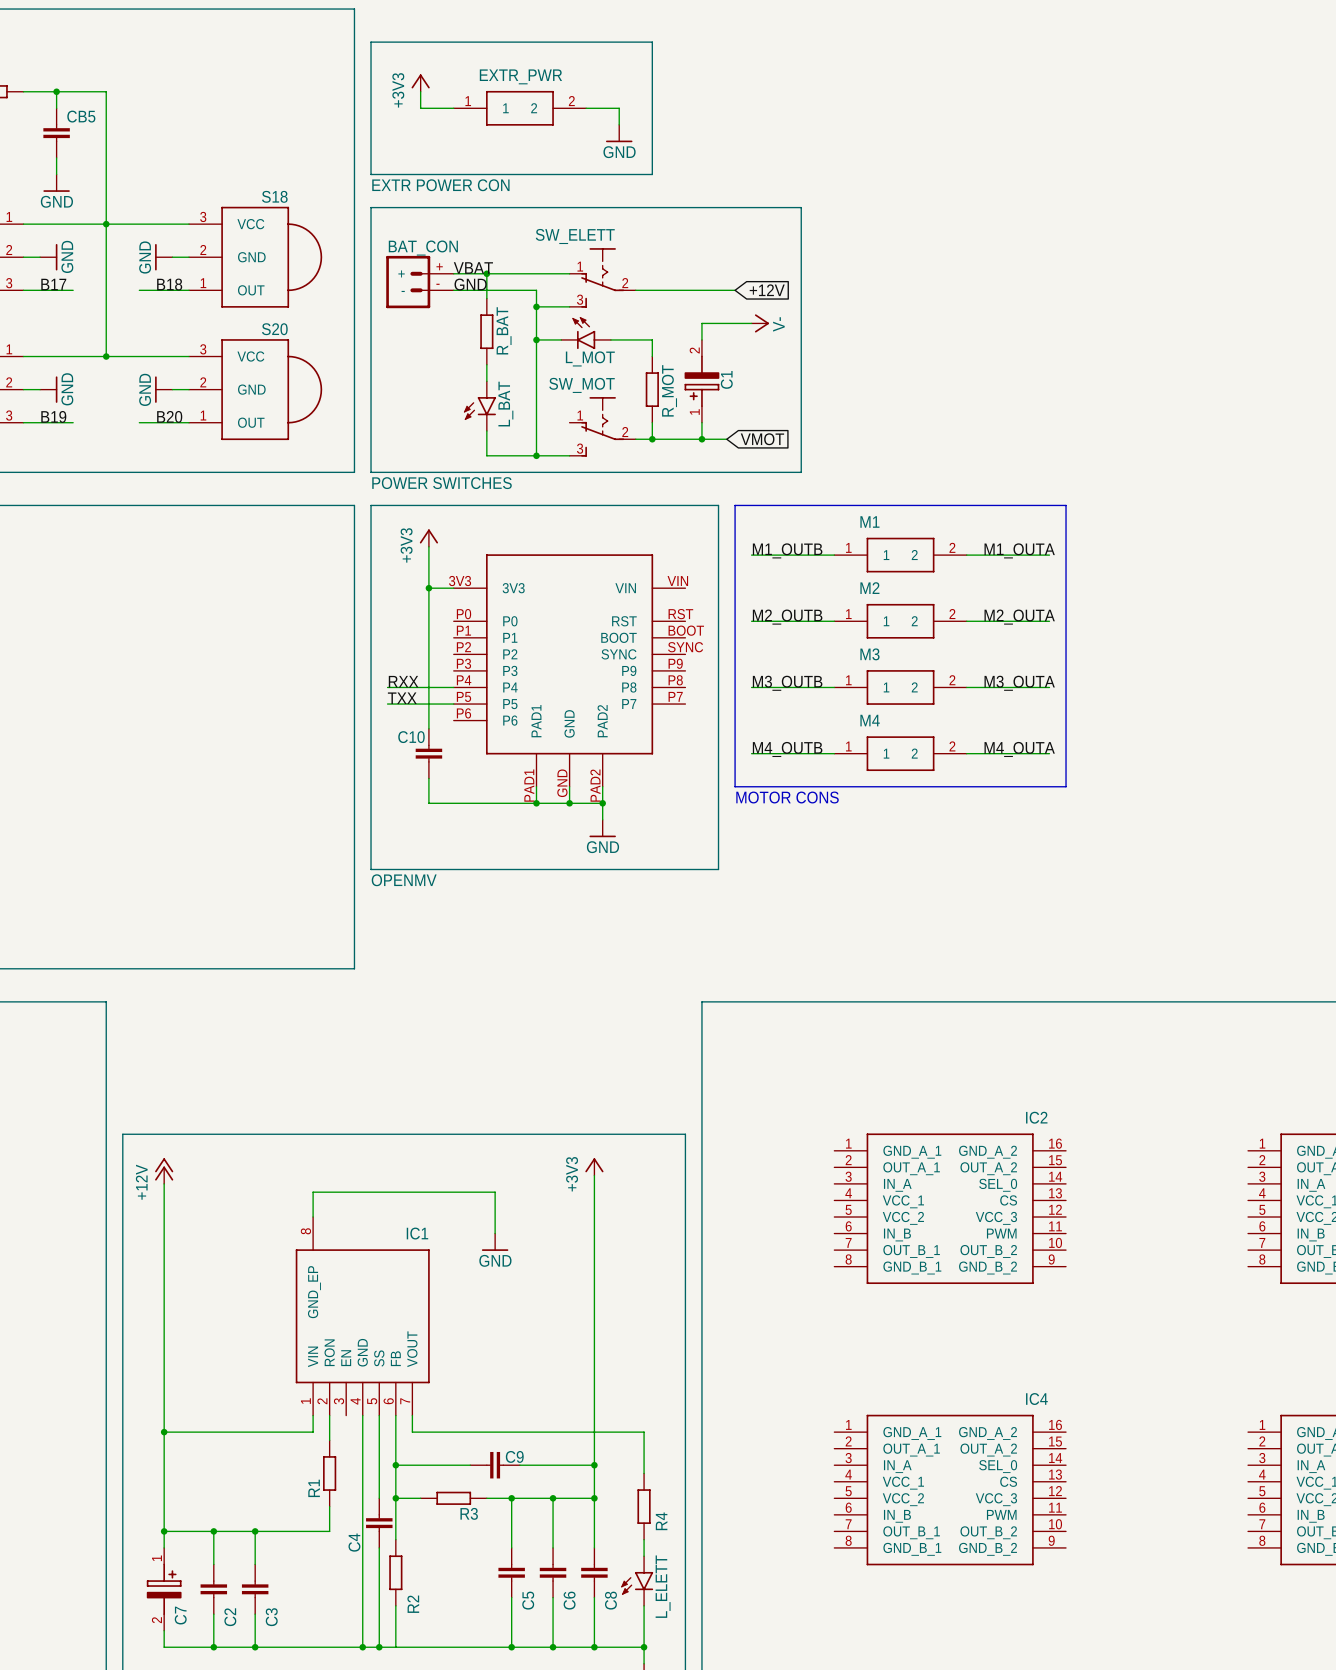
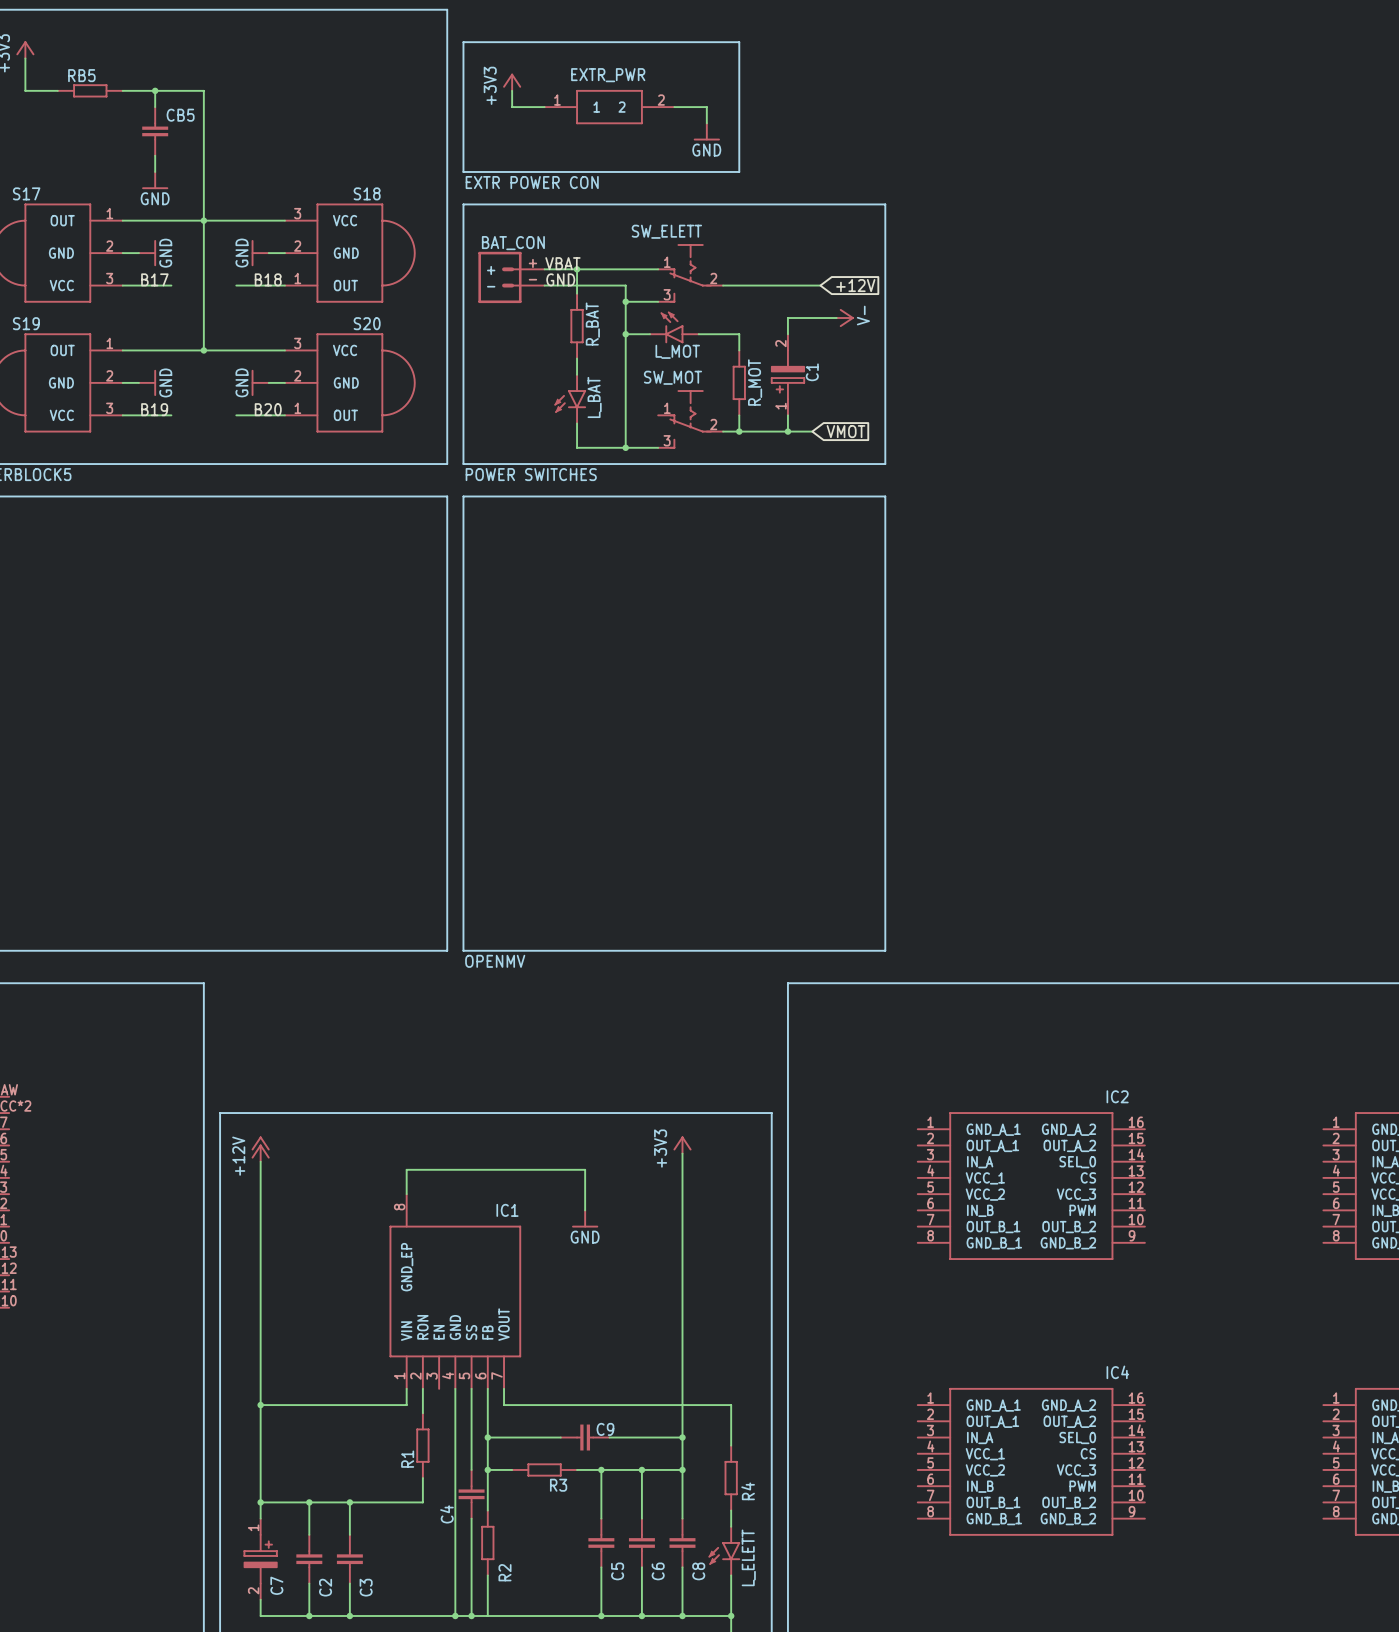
line: (718, 505) (718, 869) (371, 869) -> (804, 496) (885, 496) (885, 950) (463, 950) (463, 853)
line: (735, 505) (735, 786) (1066, 786) (1066, 505) (735, 505) -> none
power symbol: +3V3 (428, 538) -> none
wire: (428, 546) (428, 728) -> none
label: M1_OUTB (787, 550) -> none
label: M1_OUTA (1019, 550) -> none
wire: (751, 555) (834, 555) -> none
M1: (900, 555) -> none
wire: (966, 555) (1049, 555) -> none
wire: (428, 588) (453, 588) -> none
junction: (428, 588) -> none
label: M2_OUTB (787, 617) -> none
label: M2_OUTA (1019, 617) -> none
wire: (751, 621) (834, 621) -> none
M2: (900, 621) -> none
wire: (966, 621) (1049, 621) -> none
part: (569, 670) -> none
label: RXX (403, 681) -> none
label: M3_OUTB (787, 683) -> none
label: M3_OUTA (1019, 683) -> none
wire: (387, 687) (453, 687) -> none
wire: (751, 687) (834, 687) -> none
M3: (900, 687) -> none
wire: (966, 687) (1049, 687) -> none
label: TXX (402, 698) -> none
wire: (387, 704) (453, 704) -> none
label: M4_OUTB (787, 749) -> none
label: M4_OUTA (1019, 749) -> none
C10: (428, 753) -> none
wire: (751, 753) (834, 753) -> none
M4: (900, 753) -> none
wire: (966, 753) (1049, 753) -> none
wire: (428, 778) (428, 803) (602, 803) -> none
wire: (536, 786) (536, 803) -> none
wire: (569, 786) (569, 803) -> none
wire: (602, 786) (602, 819) -> none
text: MOTOR CONS (787, 797) -> none
junction: (536, 803) -> none
junction: (569, 803) -> none
junction: (602, 803) -> none
power symbol: GND (602, 828) -> none
text position: OPENMV (404, 880) -> OPENMV (495, 961)

